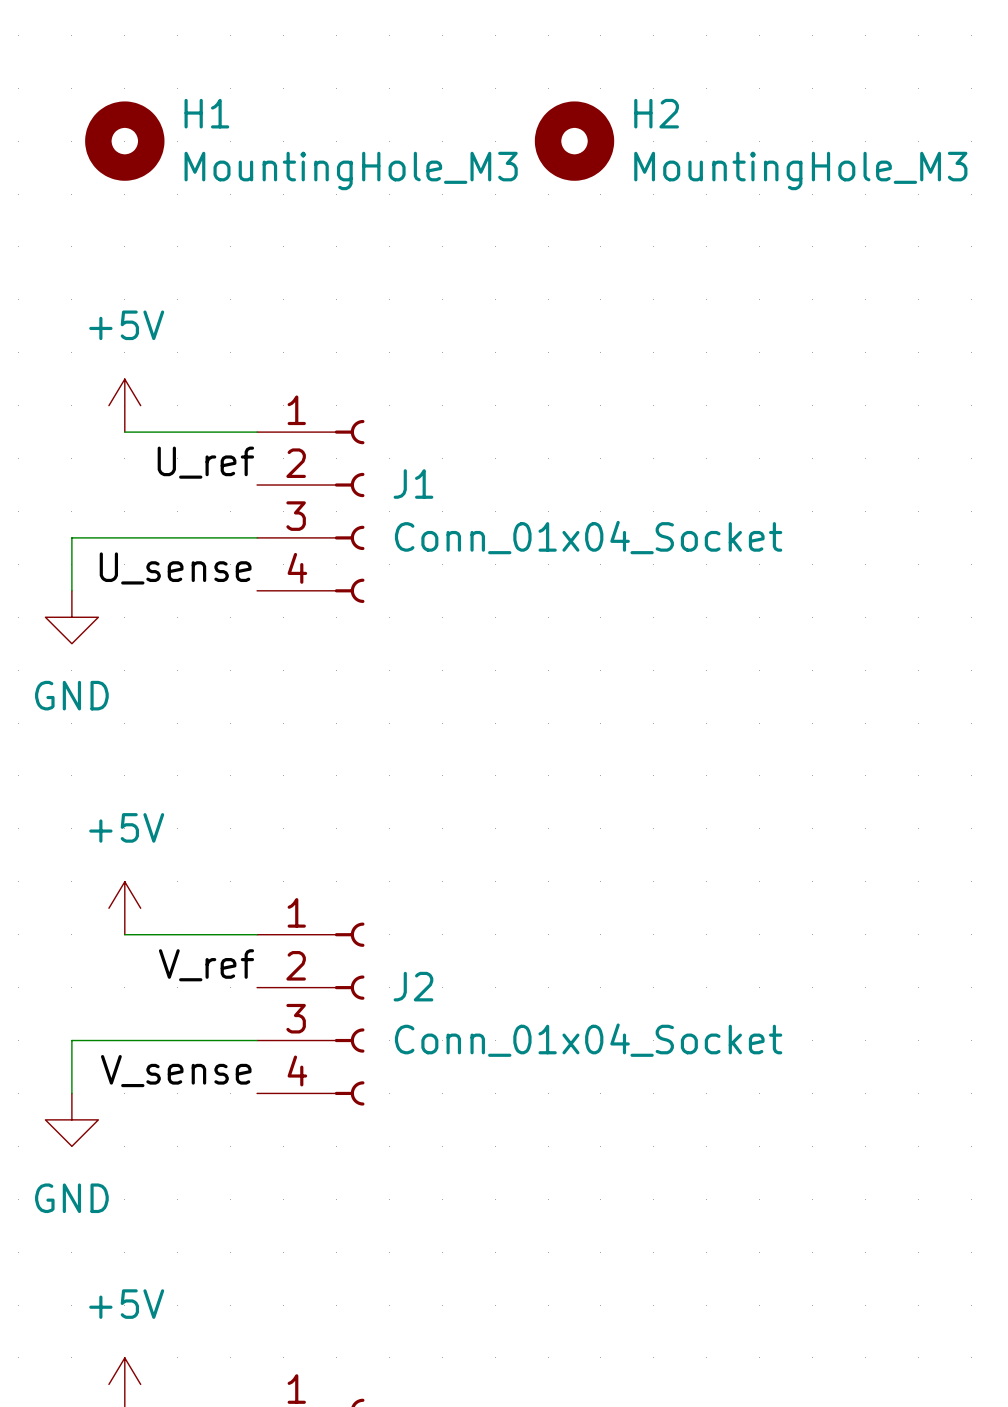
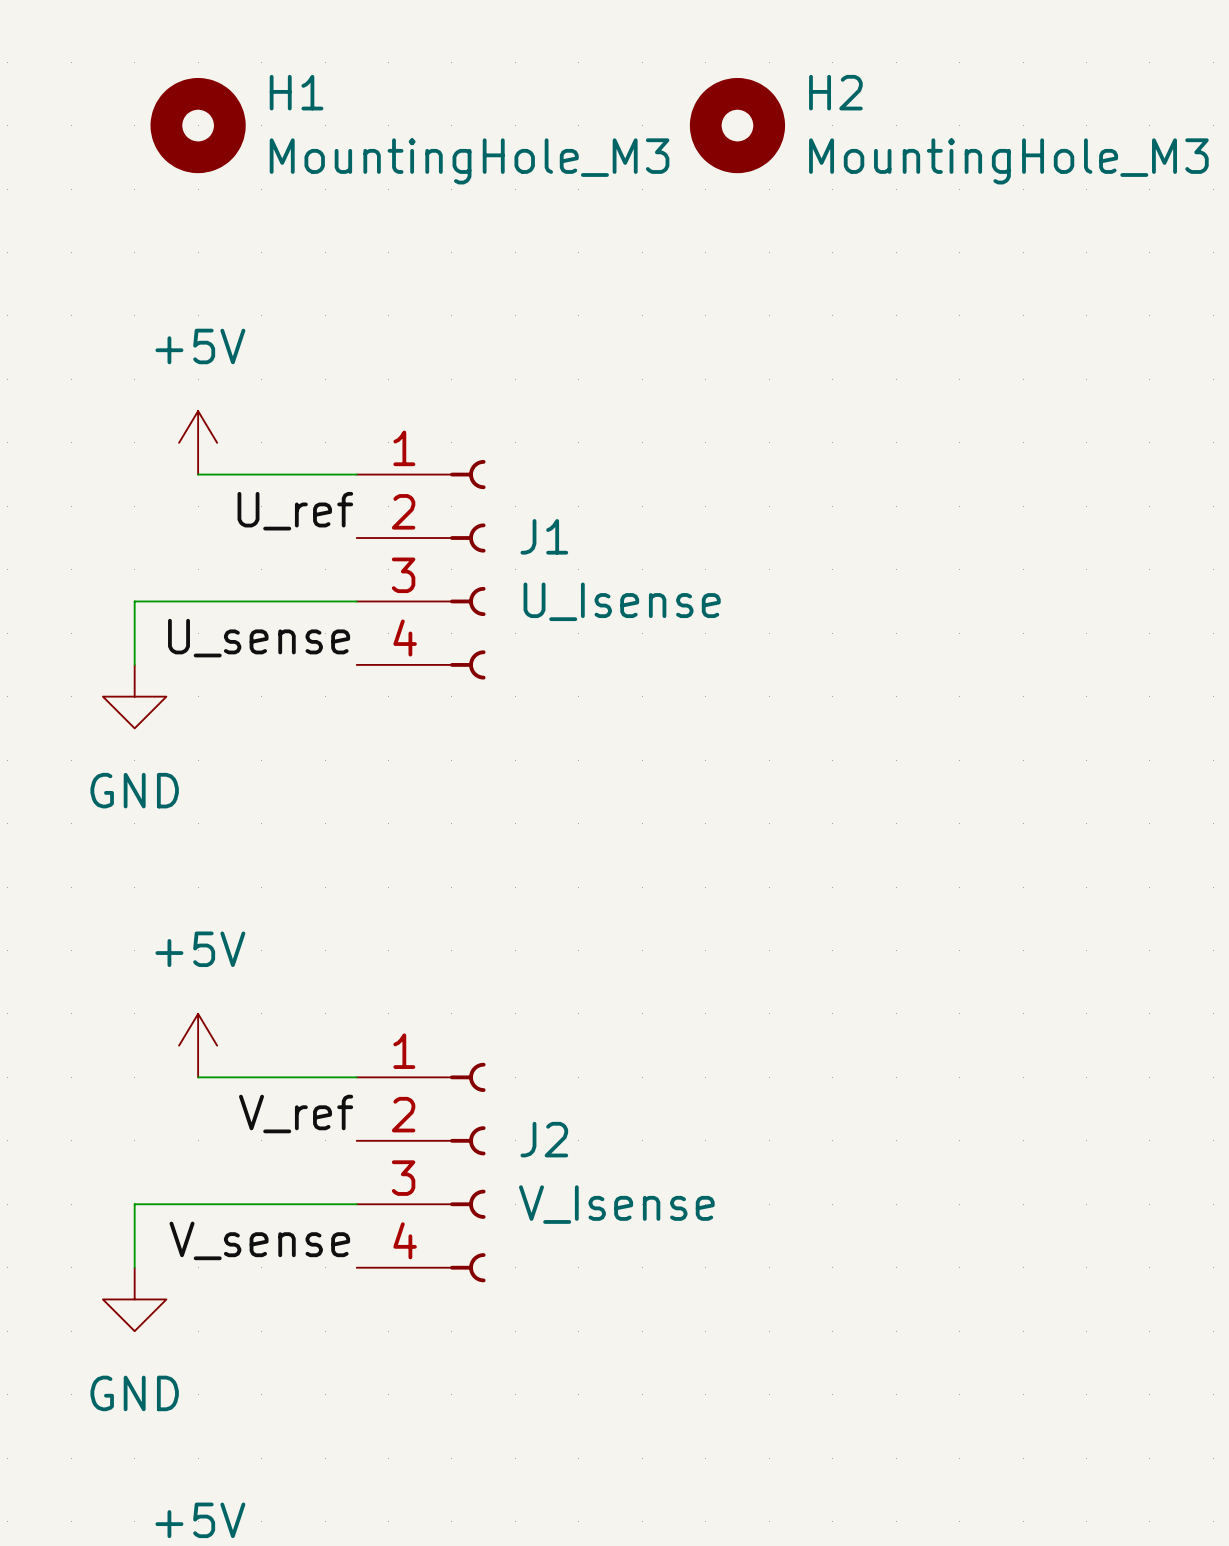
J1 value: Conn_01x04_Socket (588, 537) -> U_Isense (622, 601)
J2 value: Conn_01x04_Socket (588, 1040) -> V_Isense (616, 1204)

